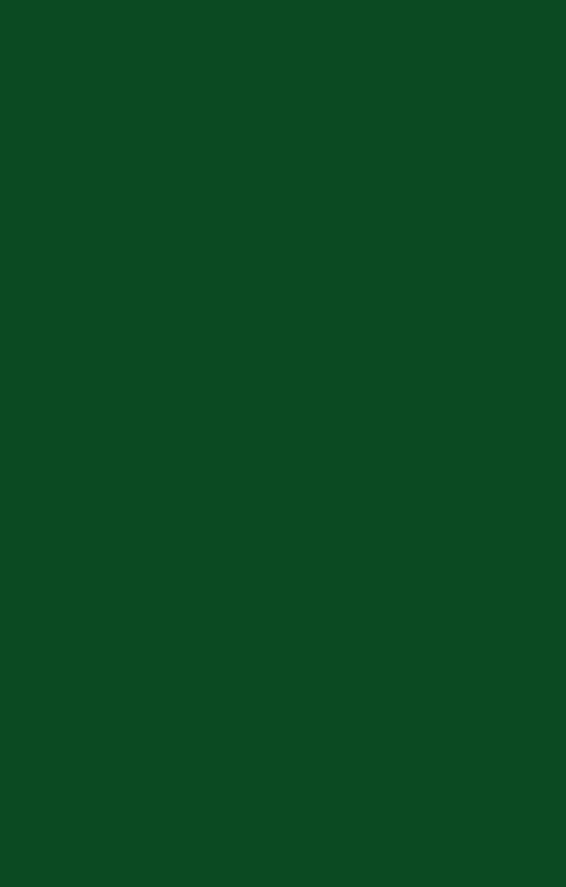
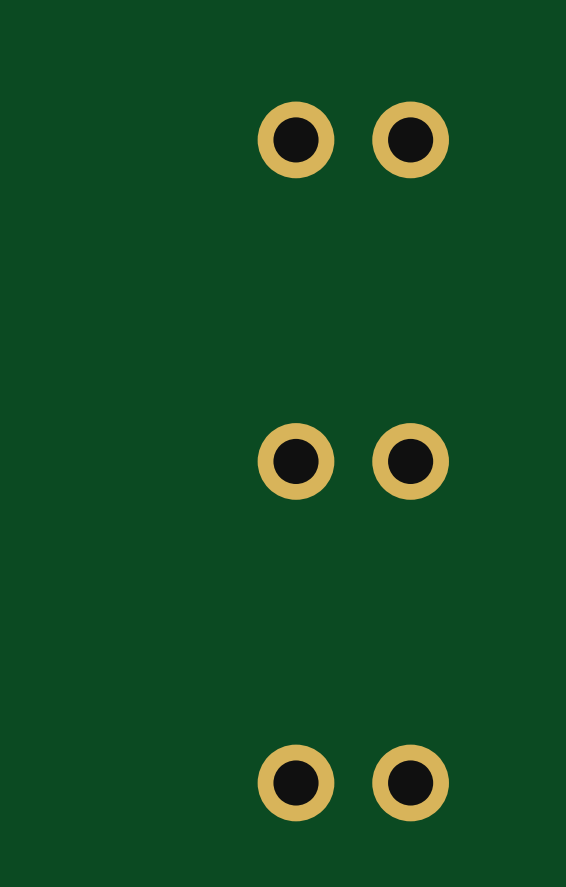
part: none -> (353, 139)
part: none -> (353, 461)
part: none -> (353, 782)

